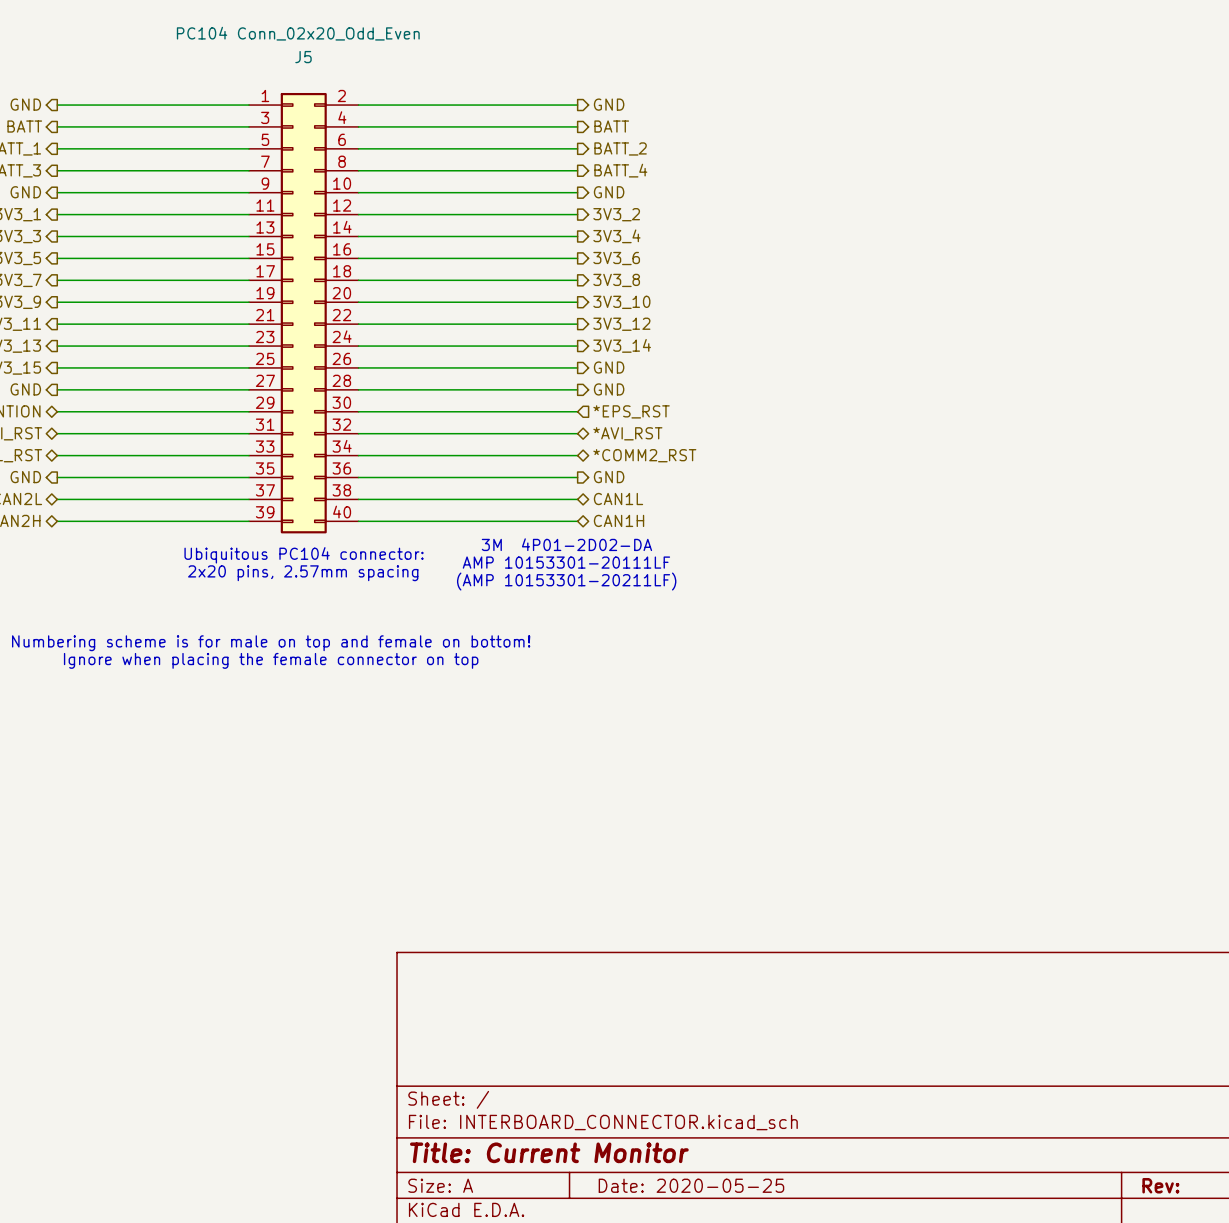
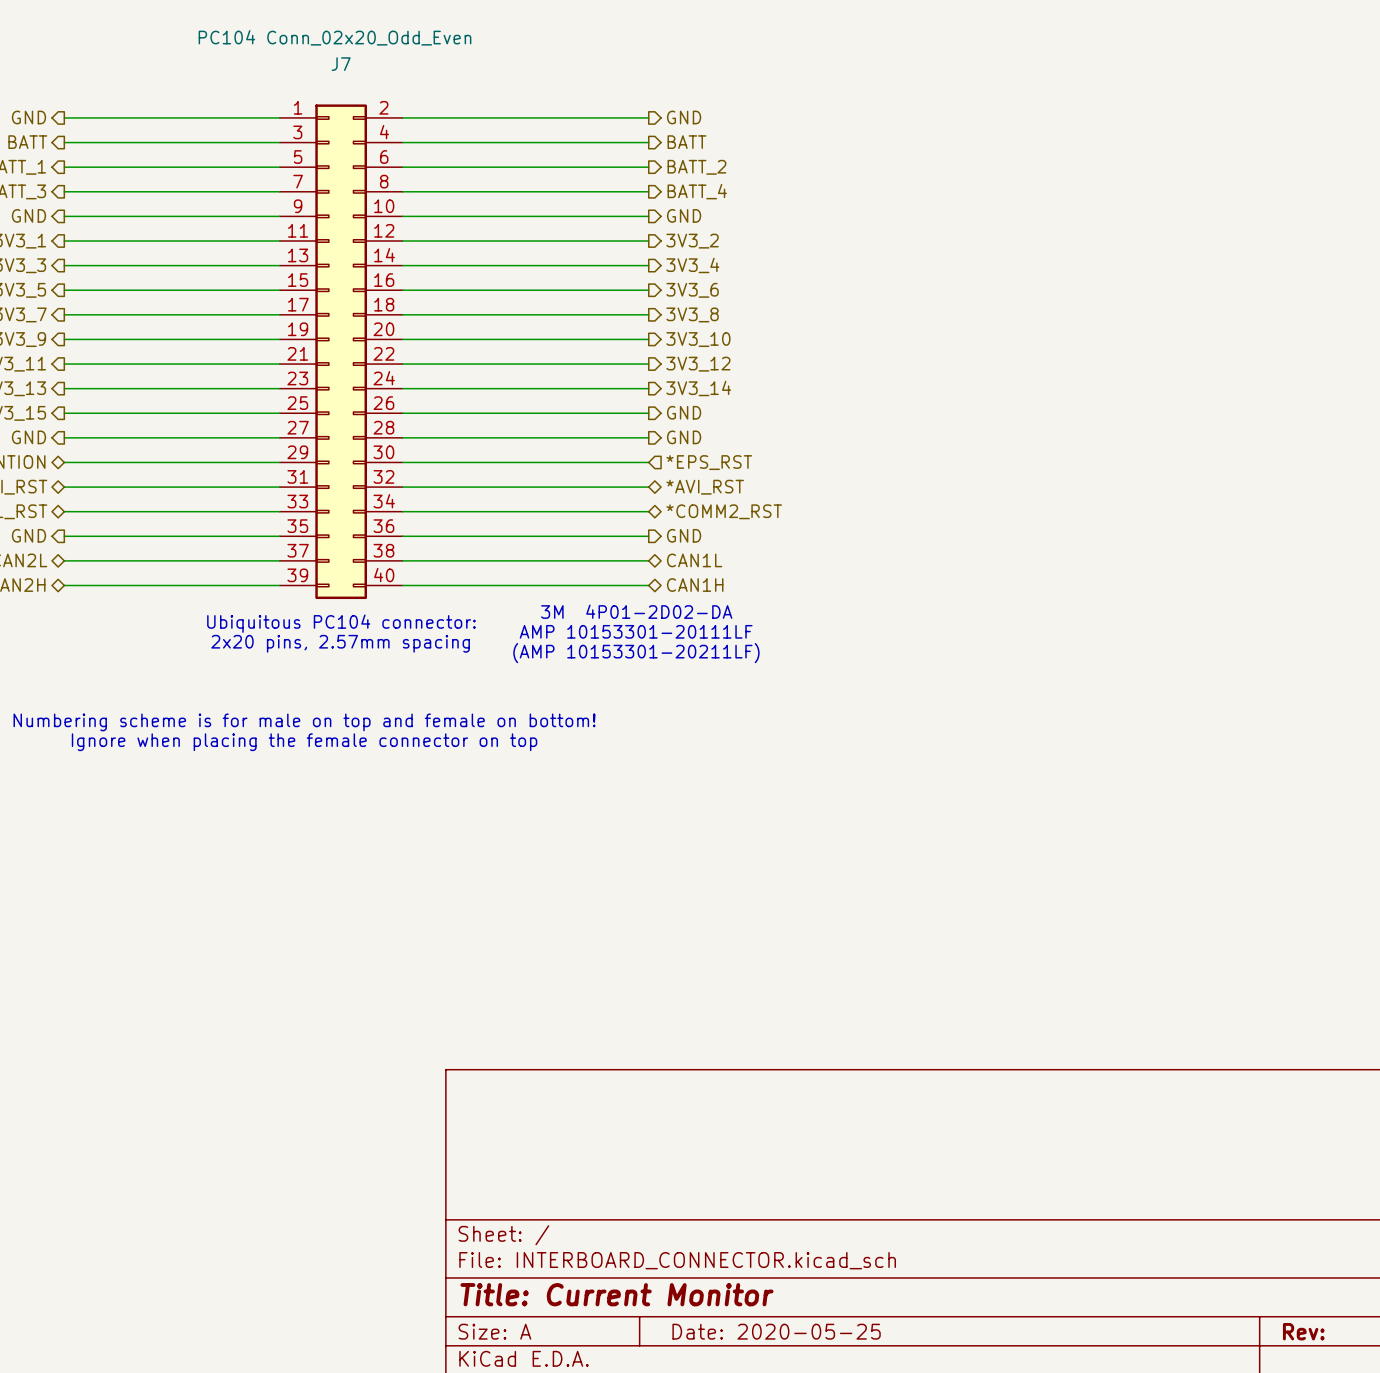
J5 name: J5 (303, 57) -> J7 (341, 64)

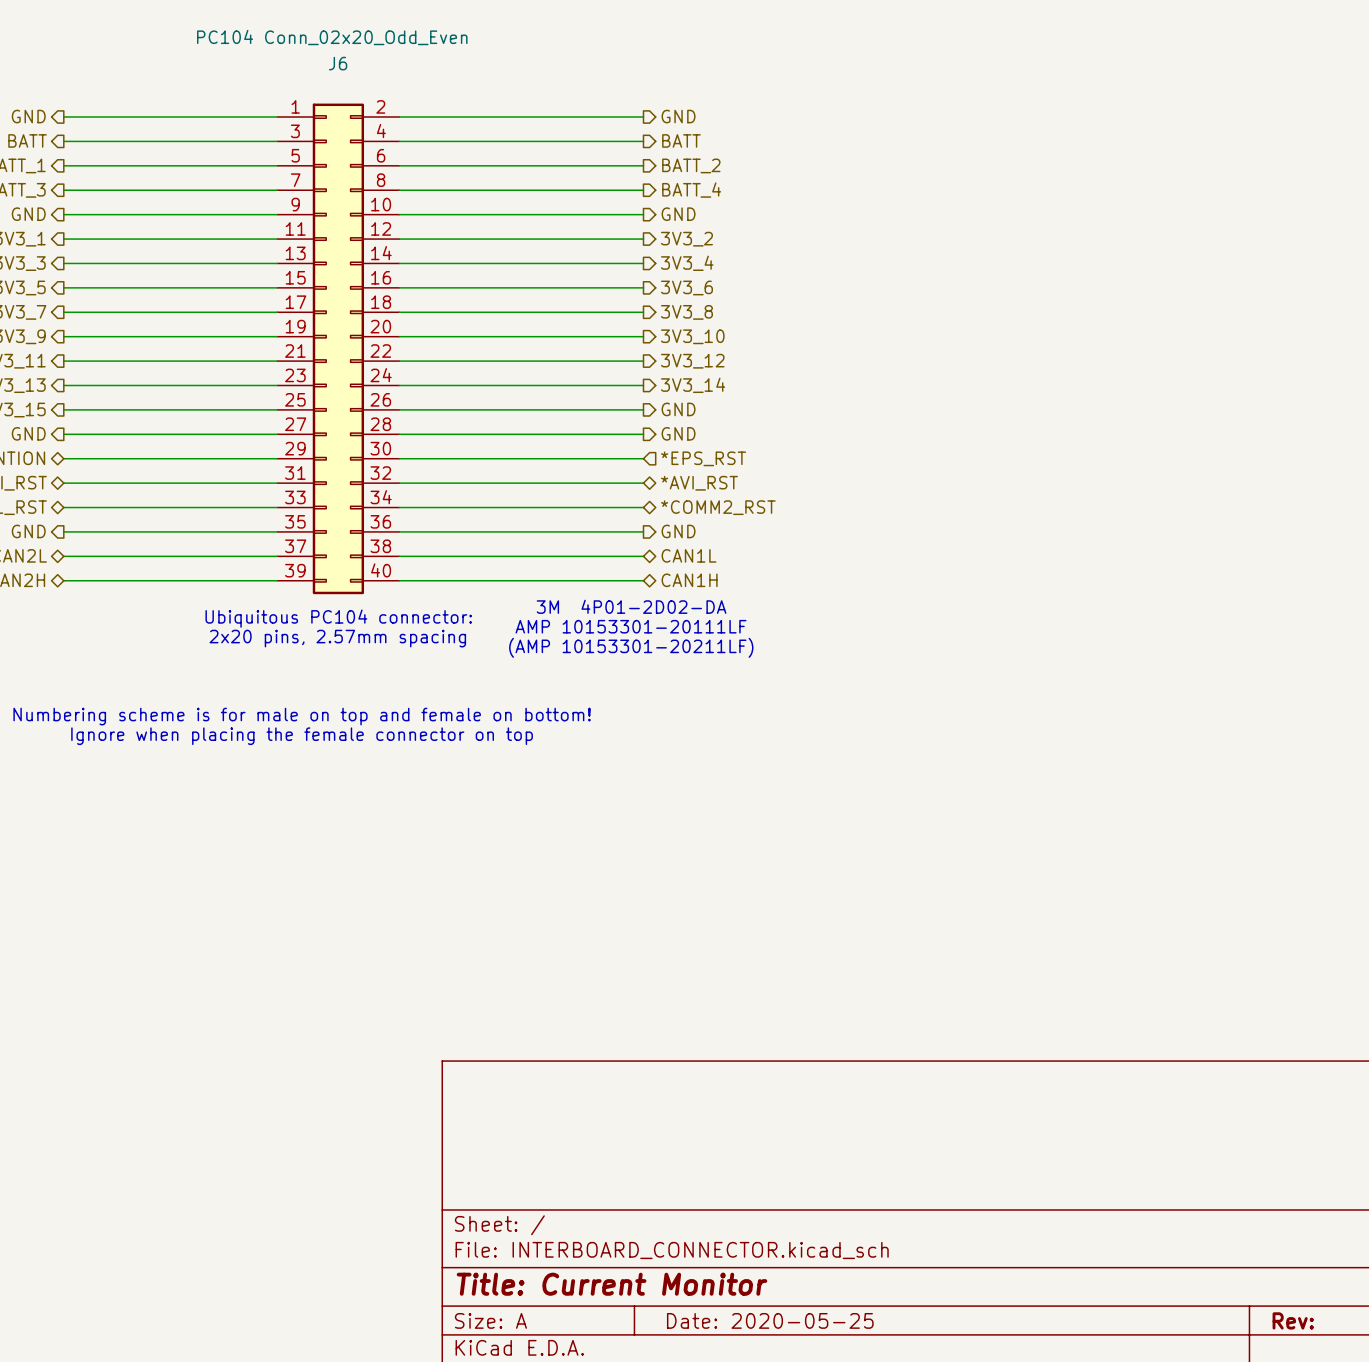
J7 name: J7 (341, 64) -> J6 (338, 63)

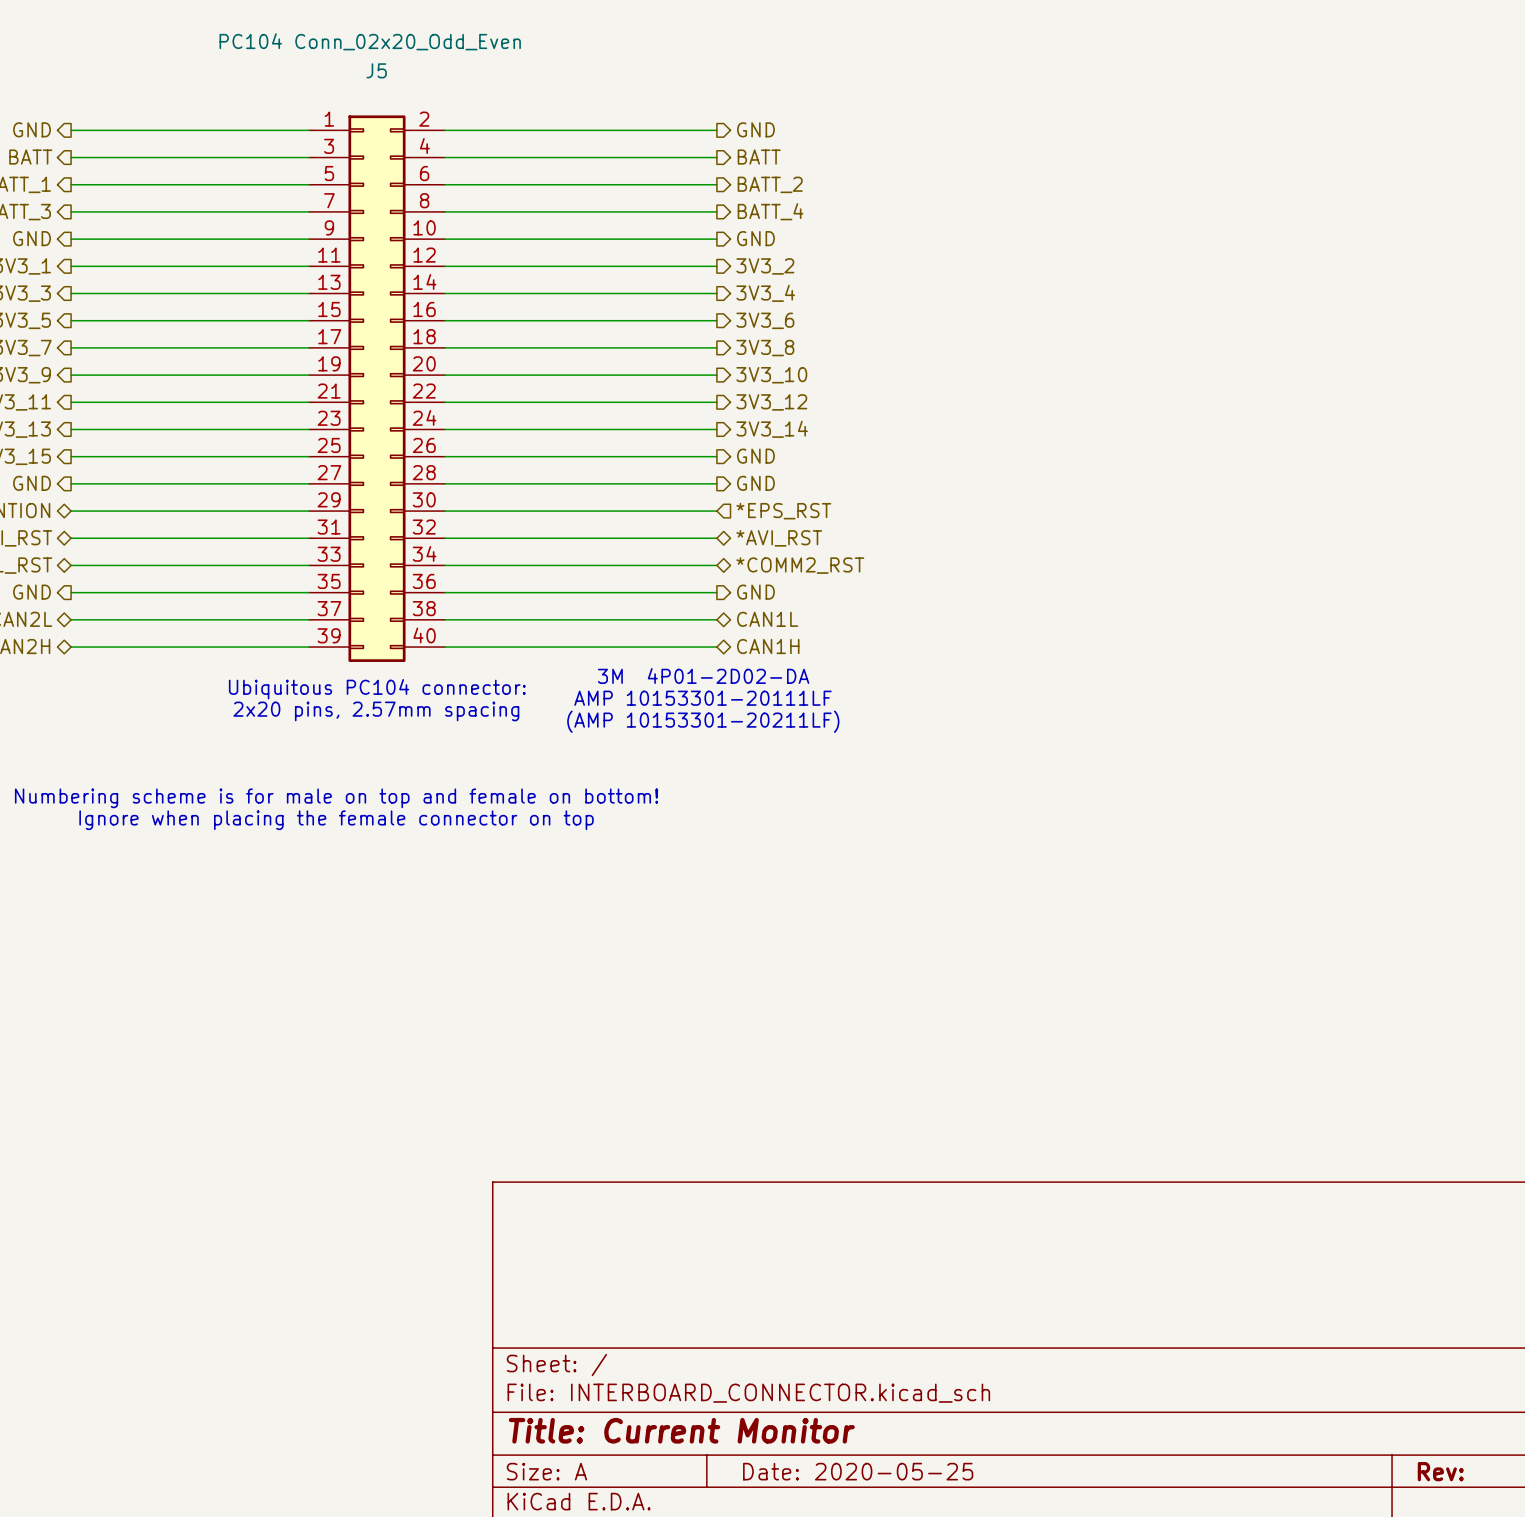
J6 name: J6 (338, 63) -> J5 (376, 70)

